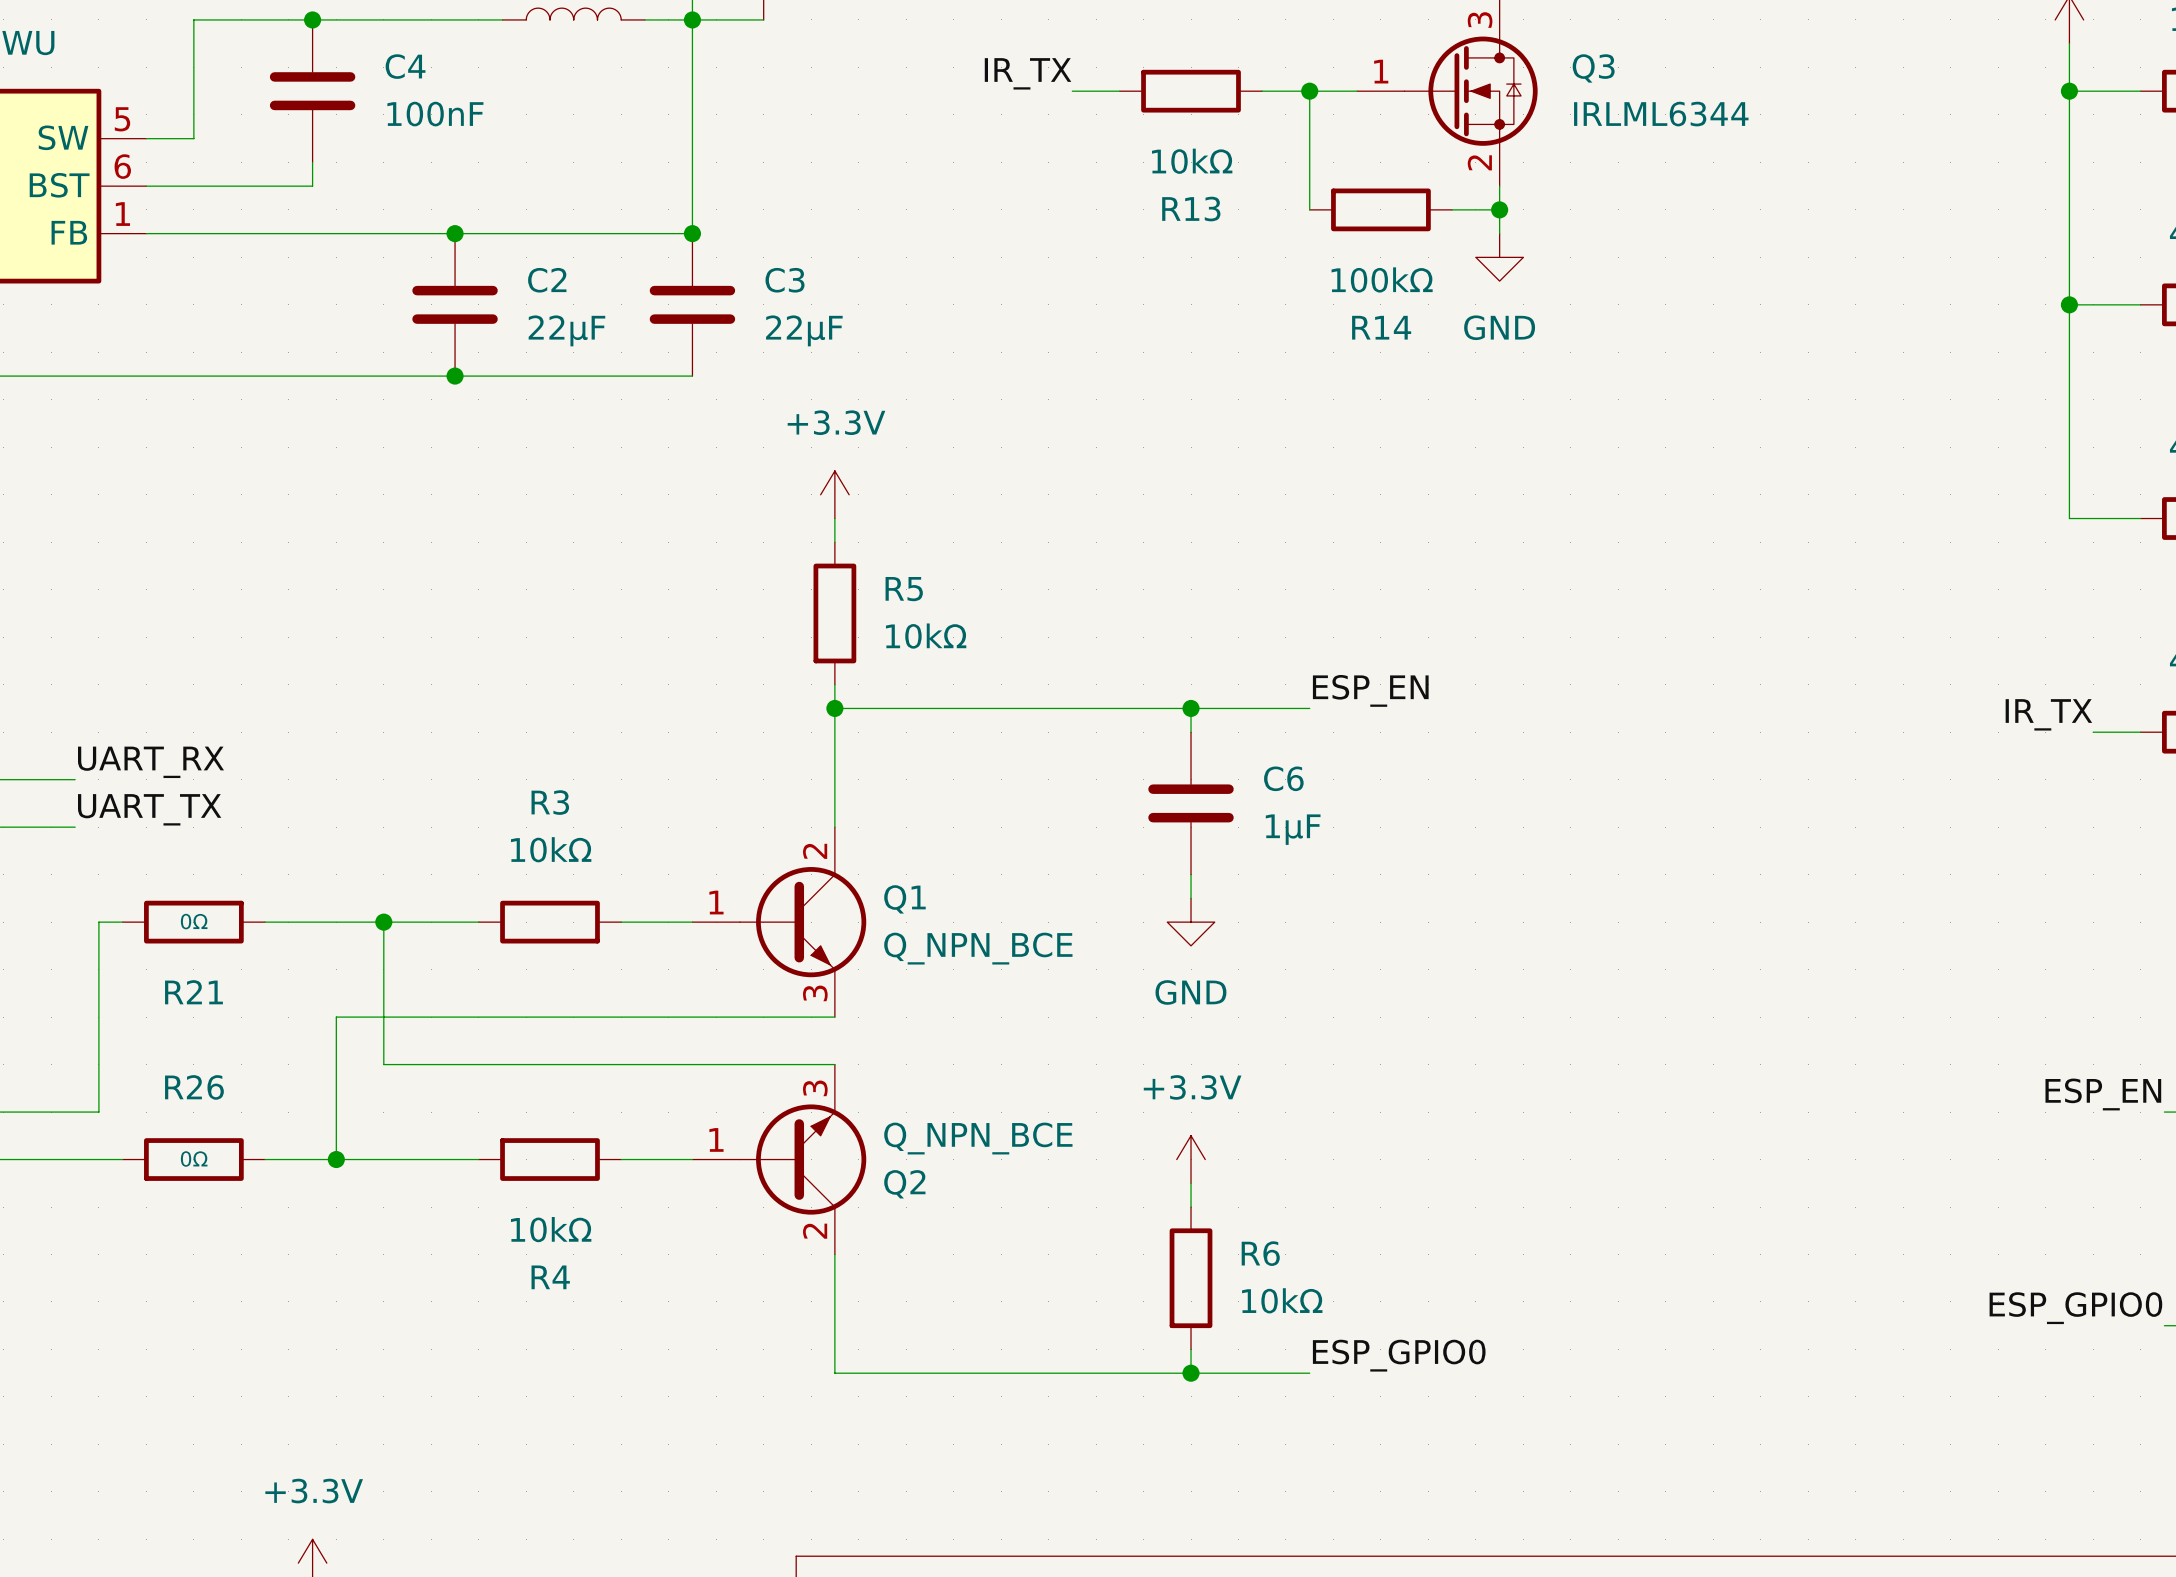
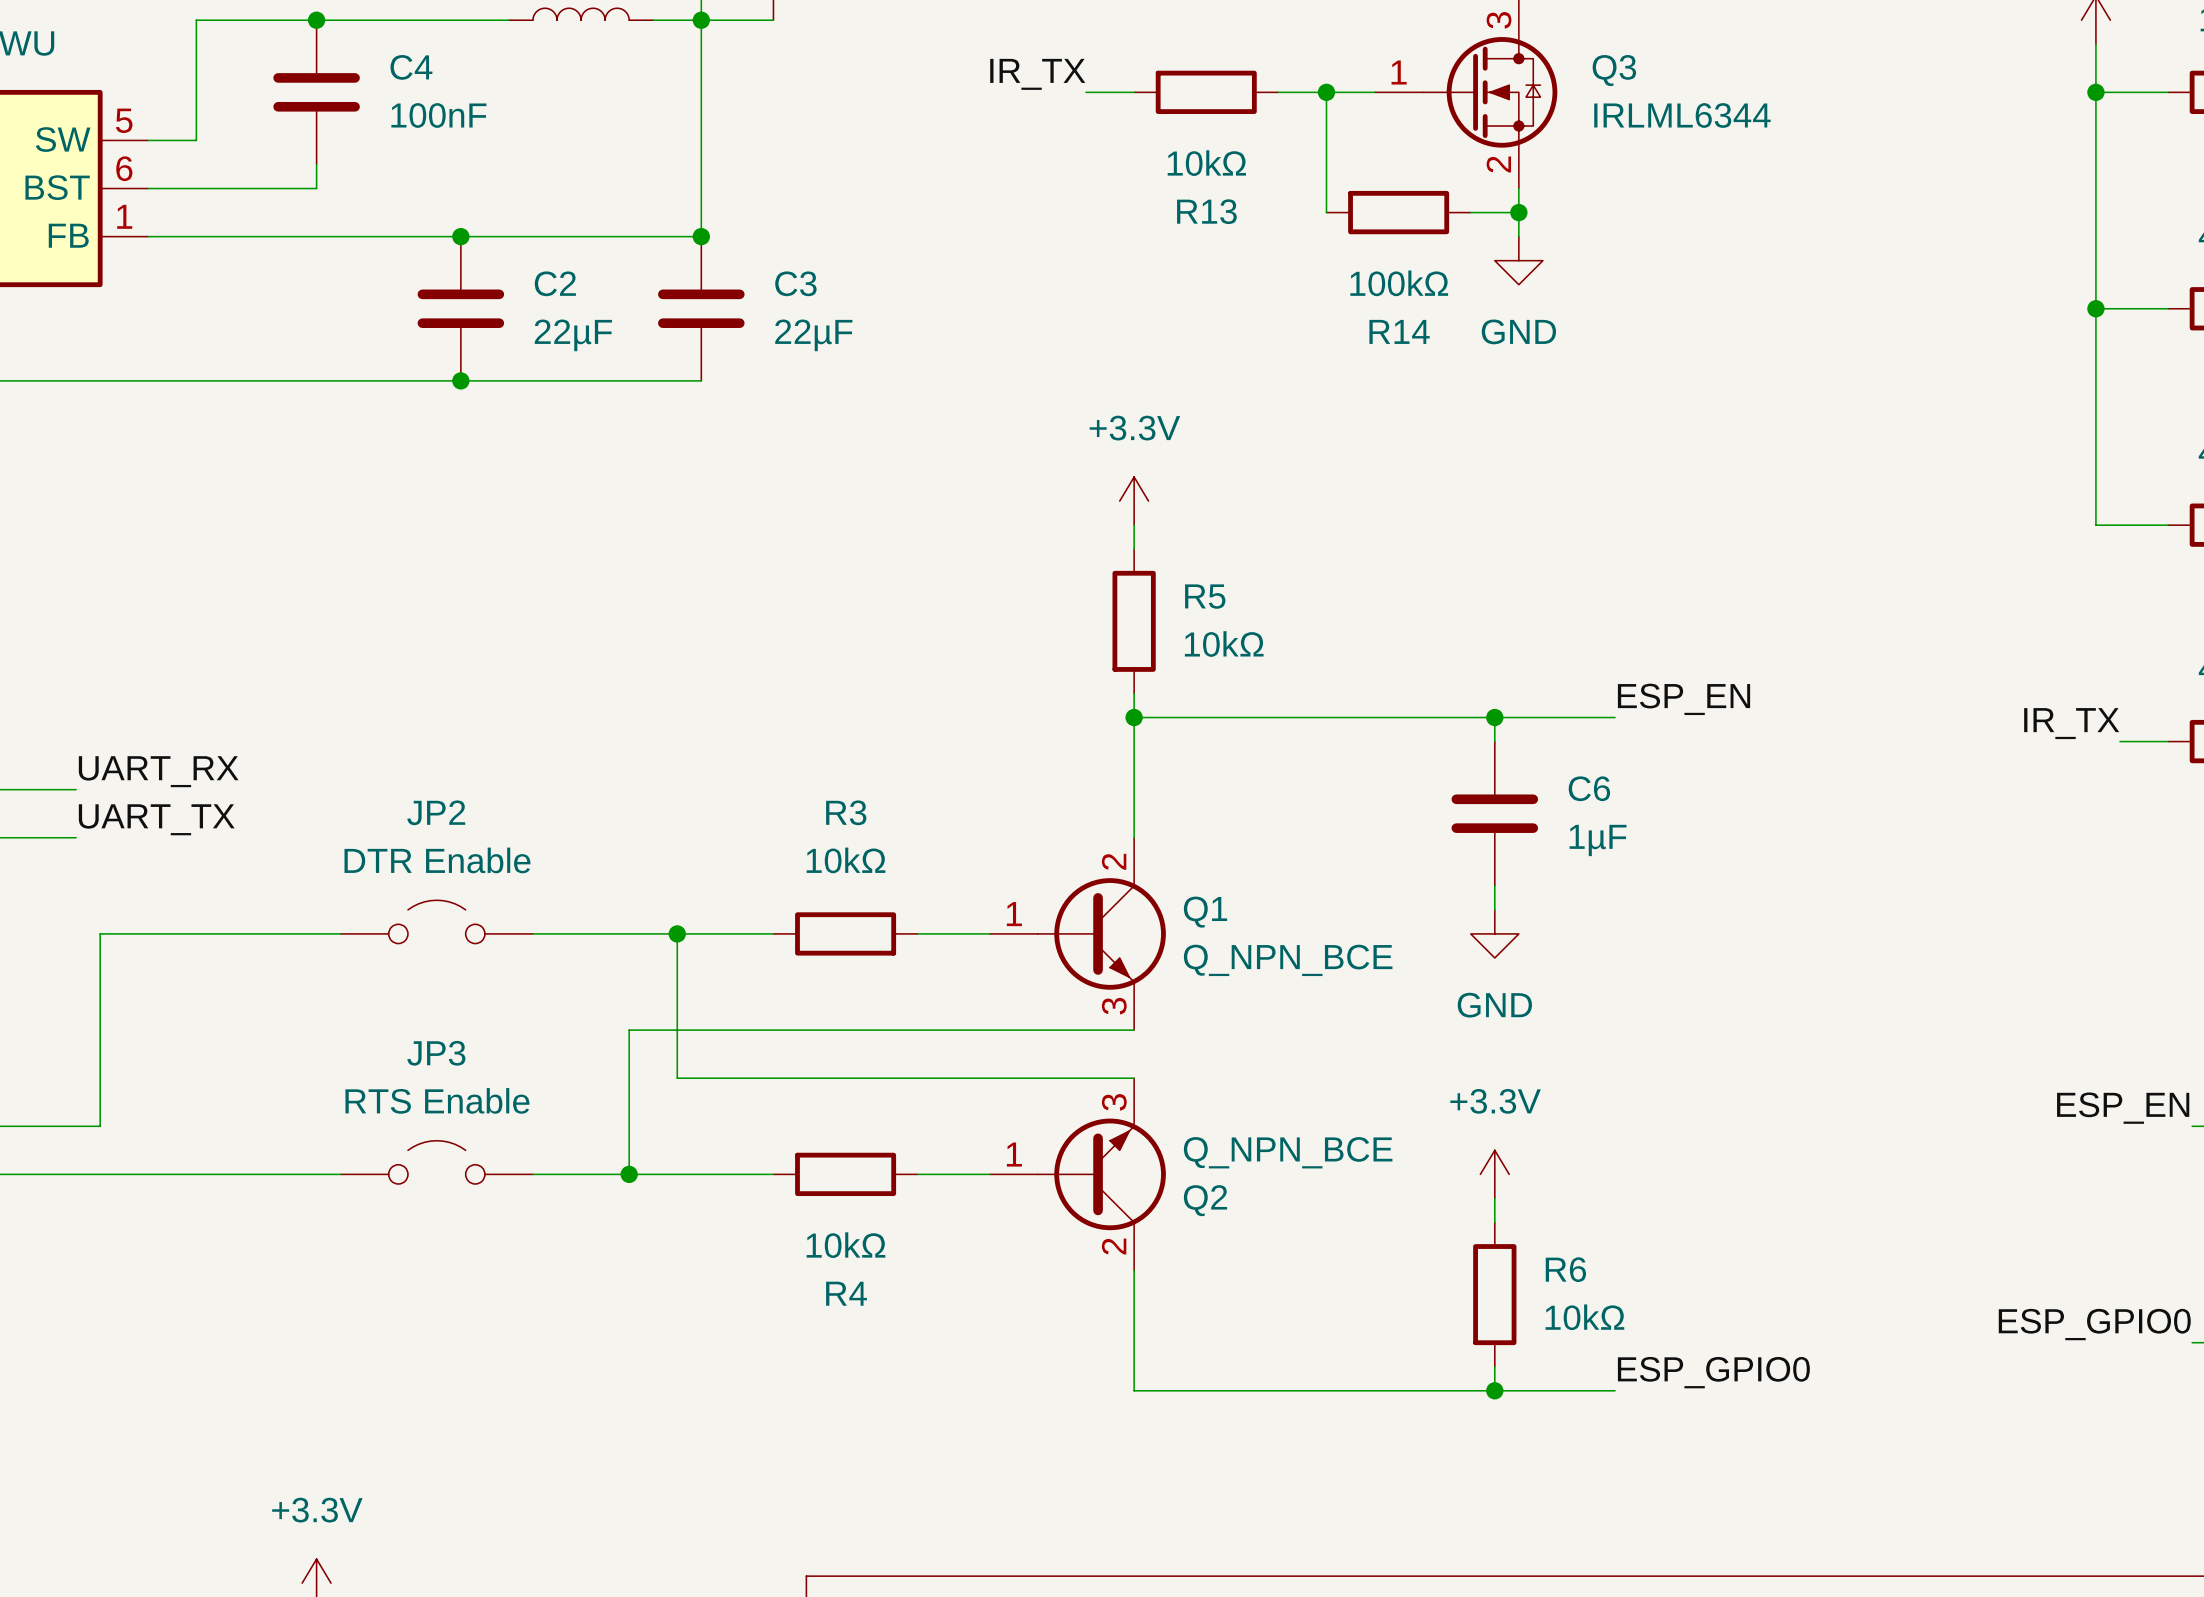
power symbol position: +3.3V (834, 494) -> +3.3V (1134, 501)
wire: (834, 518) (834, 542) -> (1134, 525) (1134, 549)
R5 position: (834, 613) -> (1134, 621)
wire: (834, 684) (834, 827) -> (1134, 693) (1134, 837)
label position: ESP_EN (1370, 690) -> ESP_EN (1684, 699)
wire: (834, 708) (1119, 708) -> (845, 1030) (1134, 1030)
junction: (834, 708) -> none
wire: (1191, 708) (1191, 732) -> (1494, 717) (1494, 741)
junction position: (1191, 708) -> (1134, 717)
wire: none -> (1326, 717) (1615, 717)
junction: none -> (1494, 717)
C6 position: (1191, 803) -> (1494, 813)
wire: (1191, 874) (1191, 898) -> (1494, 885) (1494, 909)
JP2: none -> DTR Enable (436, 921)
R21: 0Ω (193, 922) -> none
wire: (336, 922) (478, 922) -> (124, 933) (268, 933)
wire: (383, 922) (383, 1064) (668, 1064) -> (677, 933) (677, 1078)
junction: (383, 922) -> none
wire: none -> (533, 933) (629, 933)
R3 position: (550, 922) -> (845, 933)
junction: none -> (677, 933)
Q1 position: (779, 922) -> (1077, 933)
wire: none -> (917, 933) (989, 933)
power symbol position: GND (1191, 922) -> GND (1494, 933)
wire: (621, 1017) (336, 1017) (336, 1159) (478, 1159) -> (629, 1030) (629, 1174) (533, 1174)
wire: none -> (845, 1078) (1134, 1078)
JP3: none -> RTS Enable (436, 1162)
wire: none -> (124, 1174) (268, 1174)
R26: 0Ω (193, 1159) -> none
junction: (336, 1159) -> none
R4 position: (550, 1159) -> (845, 1174)
junction: none -> (629, 1174)
Q2 position: (779, 1159) -> (1077, 1174)
wire: none -> (917, 1174) (989, 1174)
power symbol position: +3.3V (1191, 1159) -> +3.3V (1494, 1174)
wire: (1191, 1183) (1191, 1207) -> (1494, 1198) (1494, 1222)
wire: (834, 1254) (834, 1373) (1119, 1373) -> (1134, 1270) (1134, 1390)
R6 position: (1191, 1278) -> (1494, 1294)
wire: (1191, 1349) (1191, 1373) -> (1494, 1366) (1494, 1390)
label position: ESP_GPIO0 (1399, 1355) -> ESP_GPIO0 (1713, 1372)
junction: (1191, 1373) -> none
wire: none -> (1326, 1390) (1615, 1390)
junction: none -> (1494, 1390)

